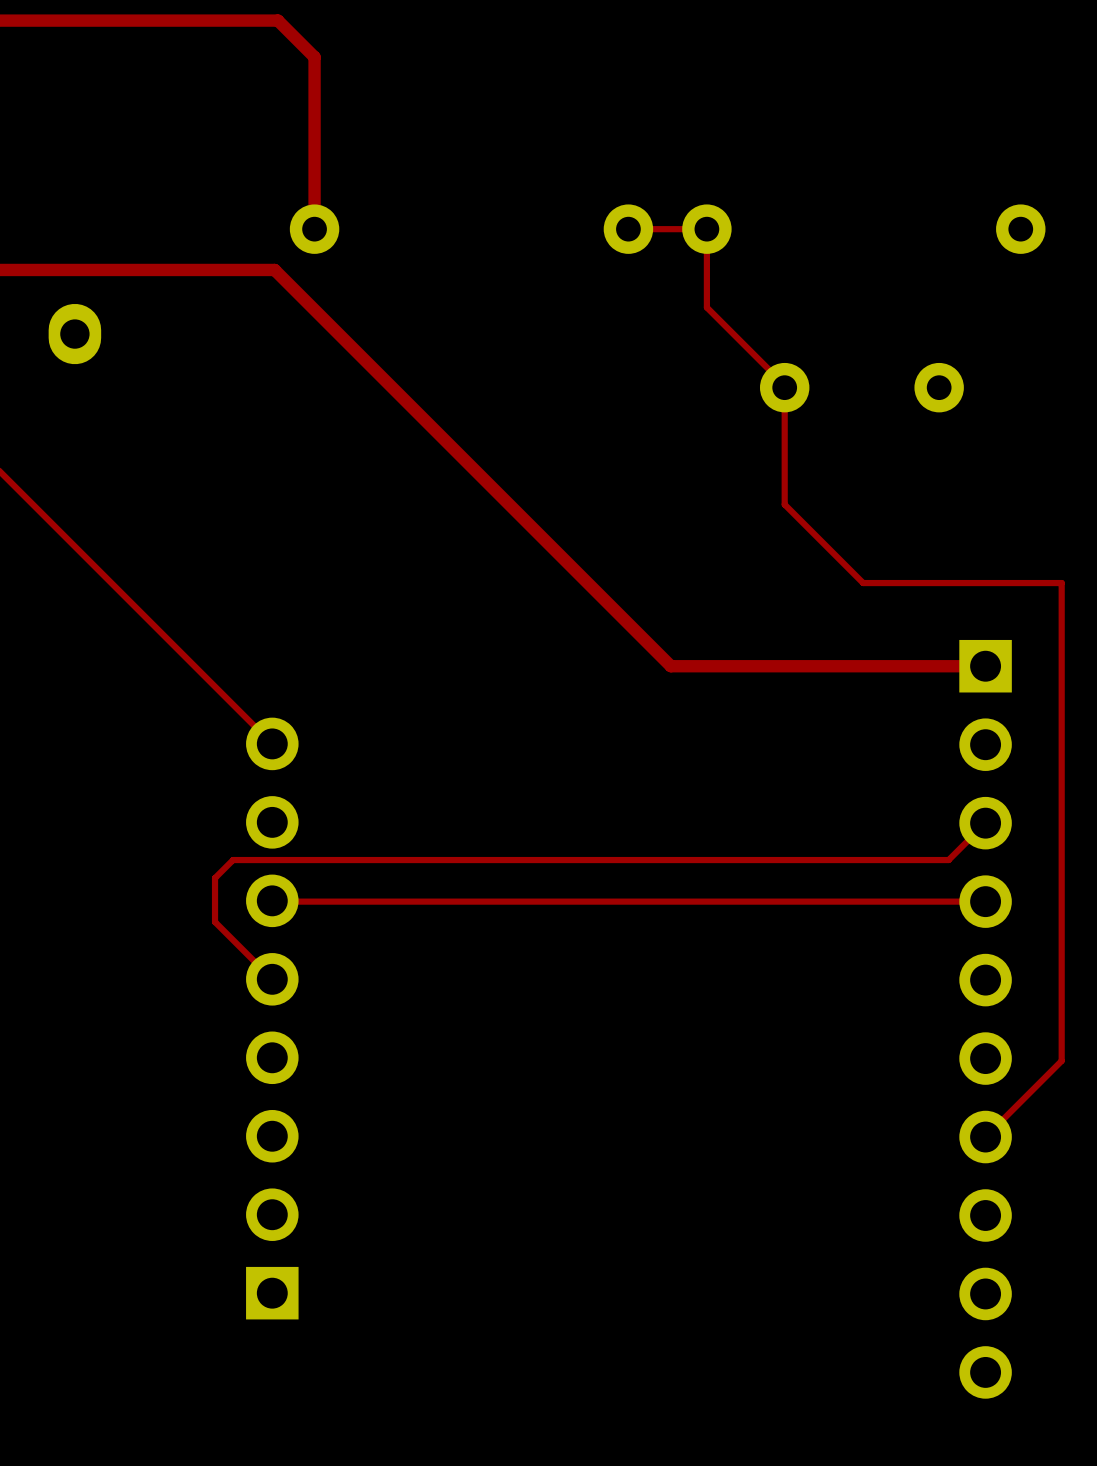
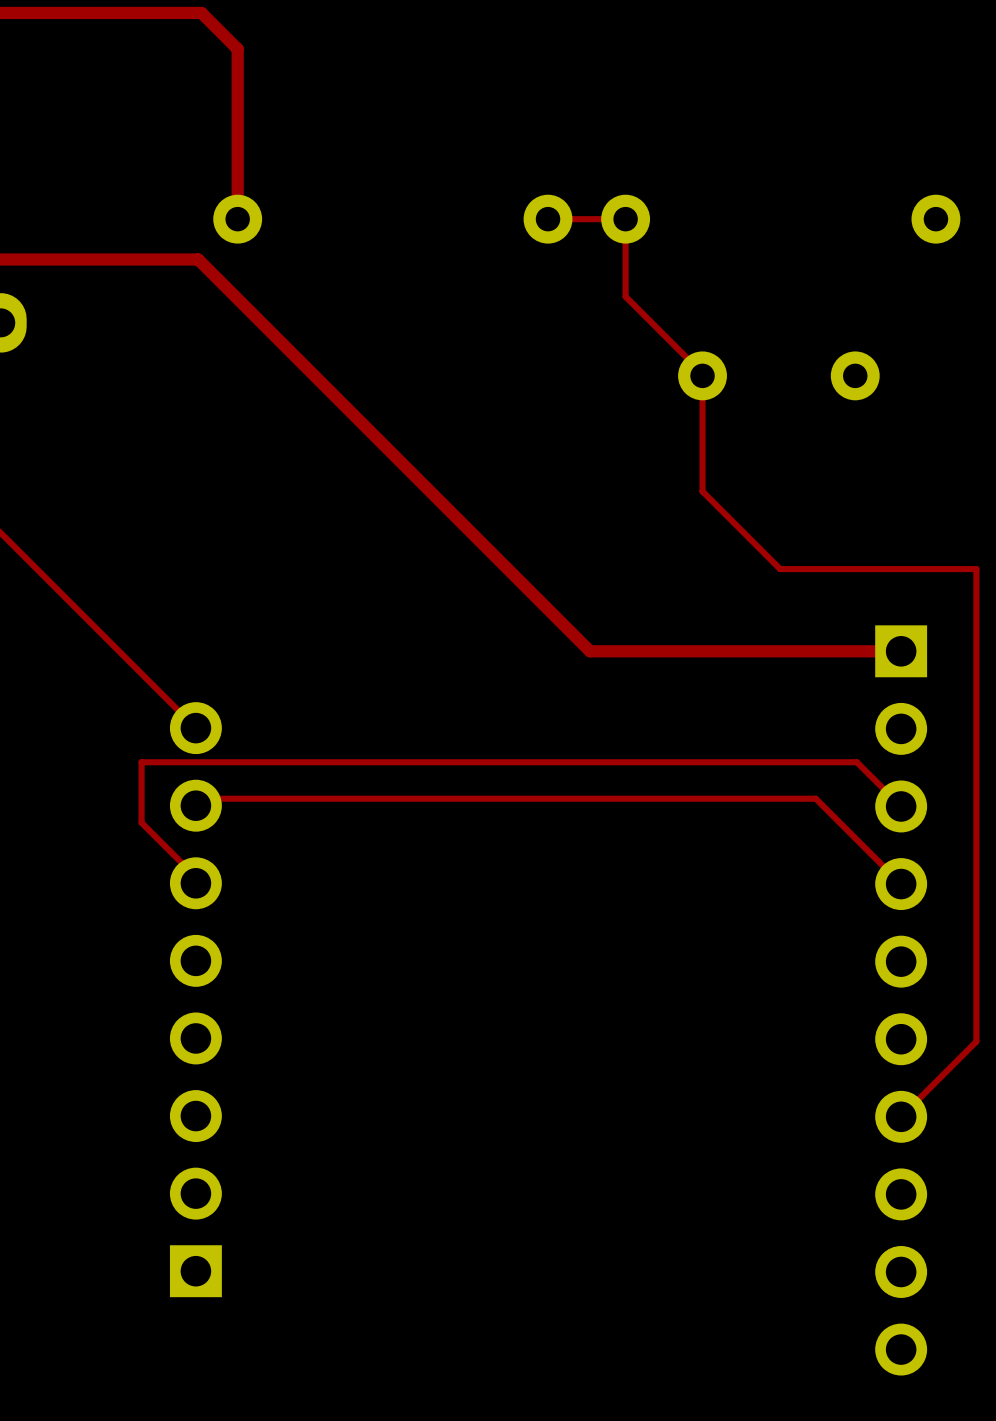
top track: (985, 823) (948, 860) (233, 860) (215, 878) (215, 922) (272, 979) -> (901, 806) (856, 762) (141, 762) (141, 822) (195, 876)
top track: (272, 900) (985, 901) -> (195, 798) (815, 798) (901, 884)

